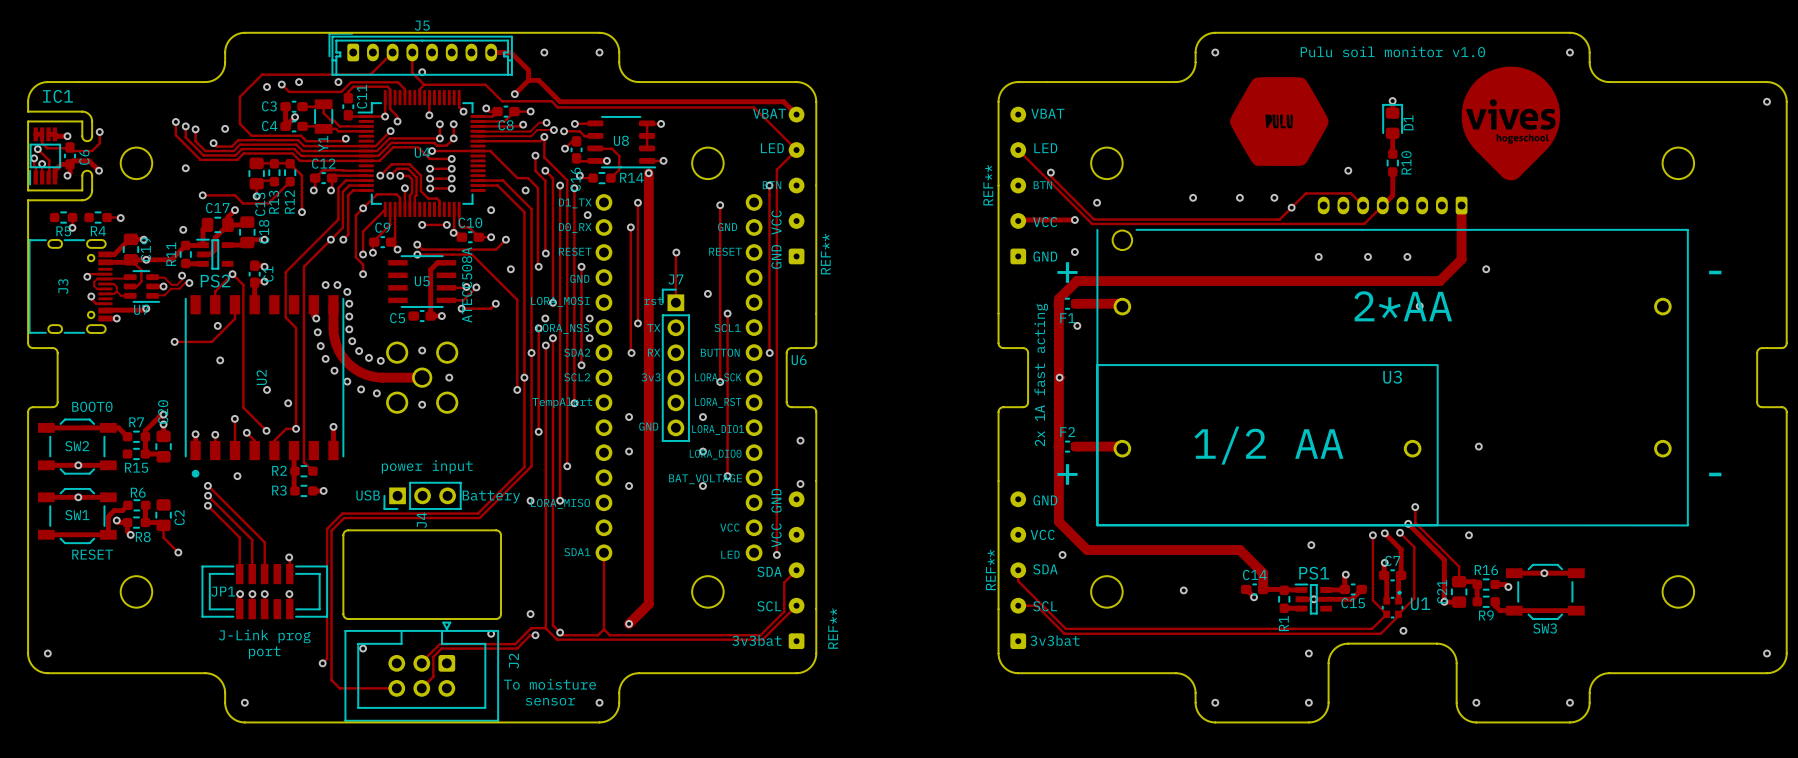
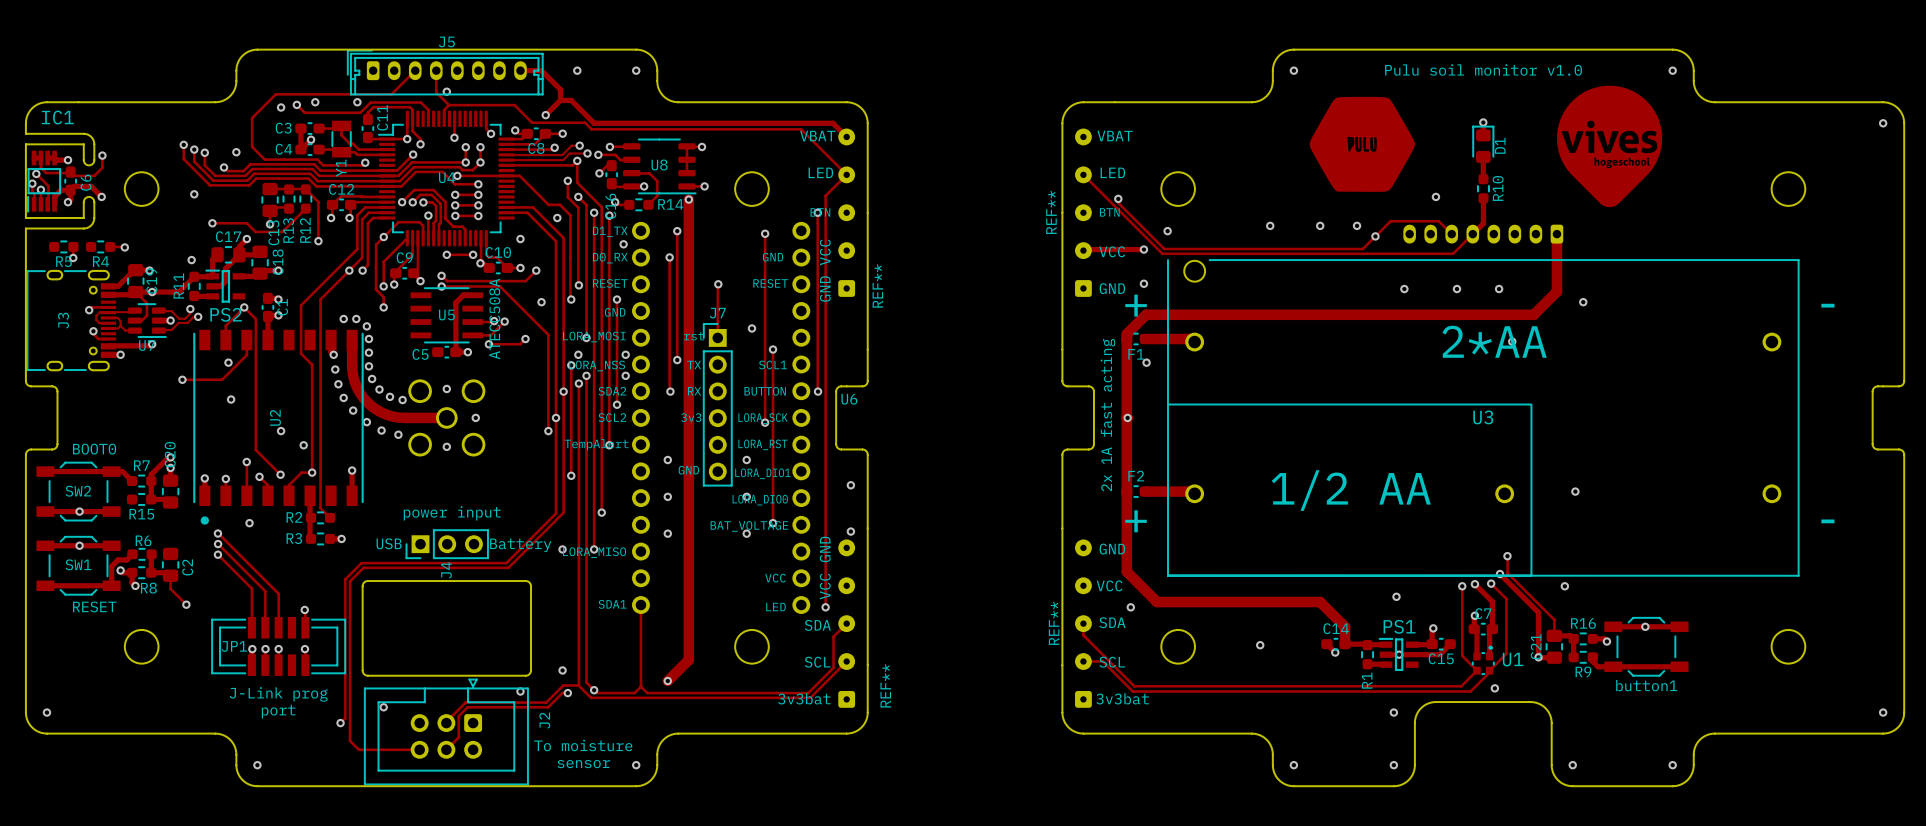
SW3 name: SW3 (1545, 628) -> button1 (1646, 685)

